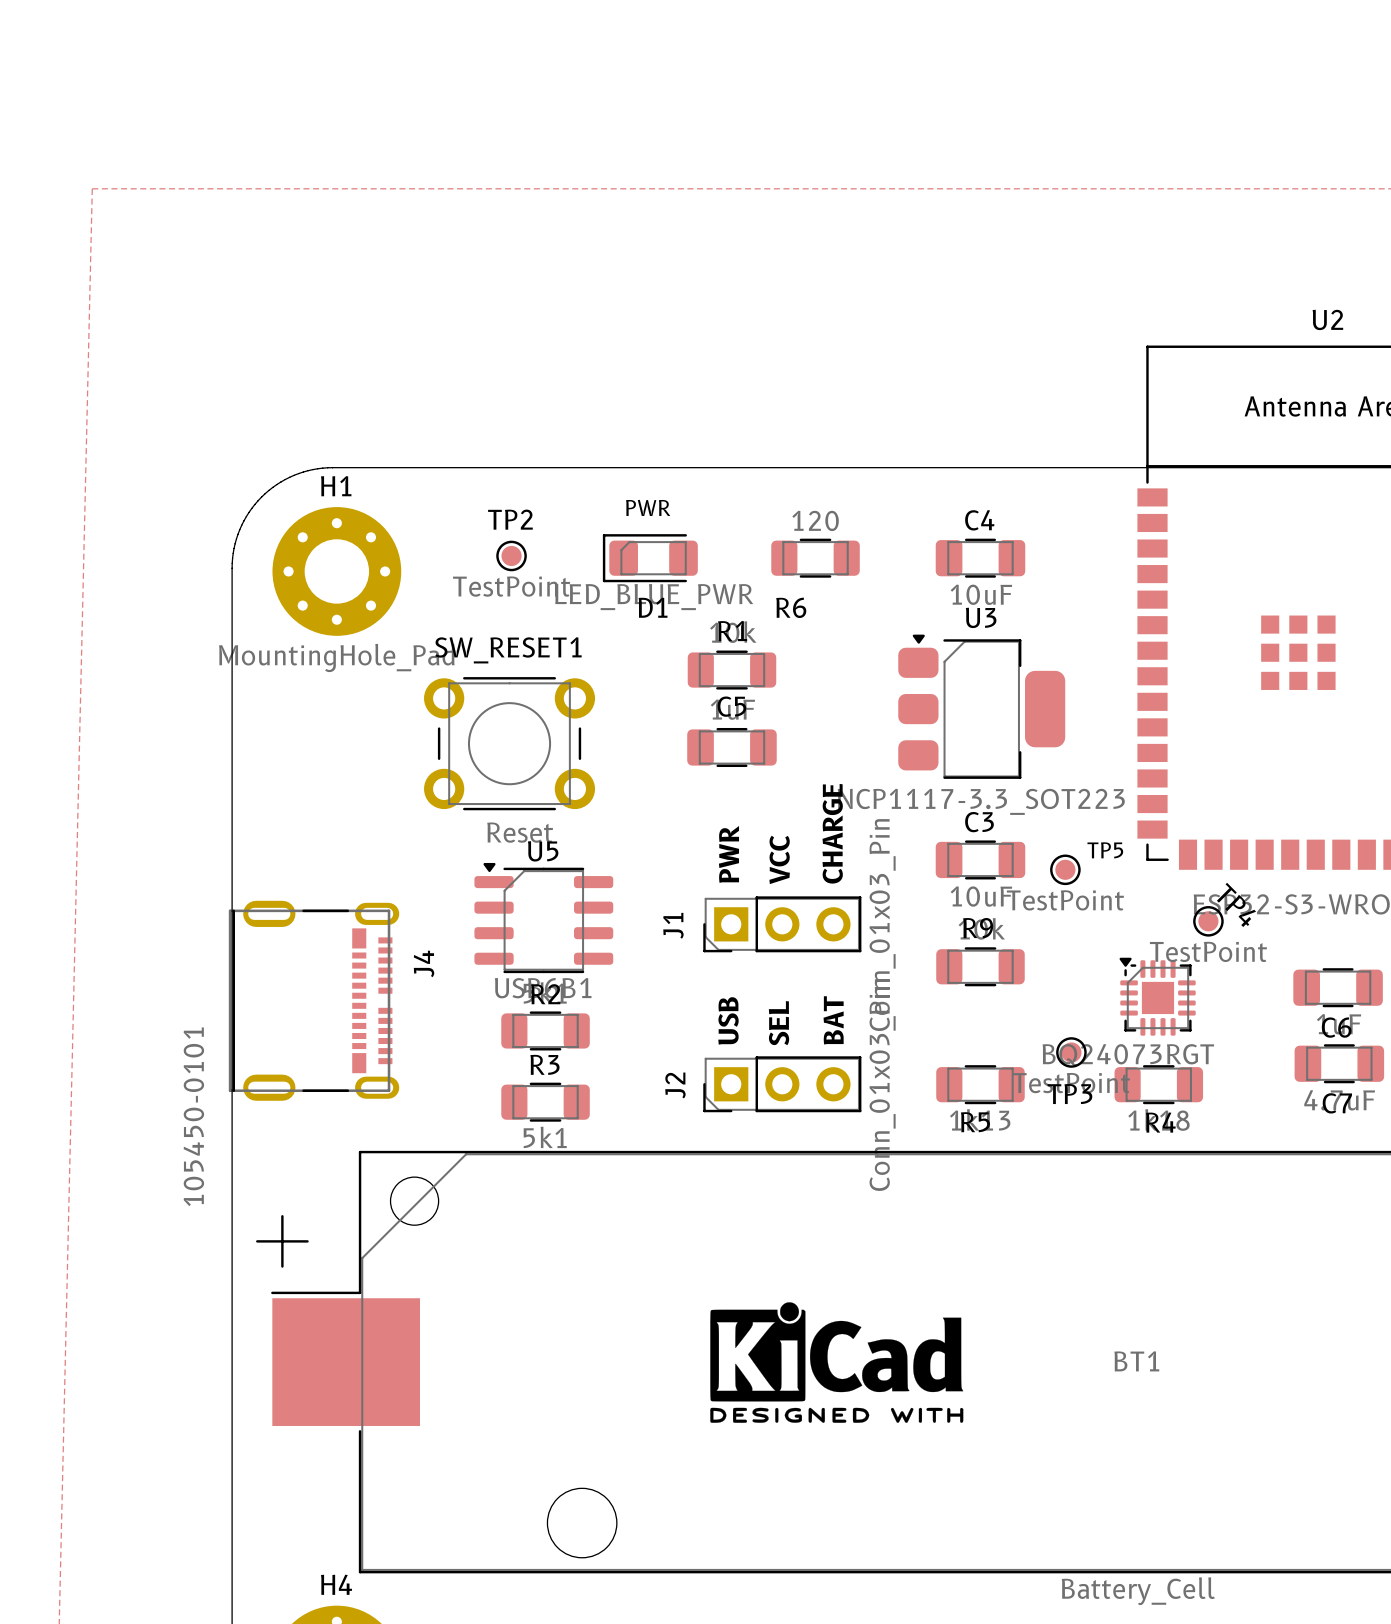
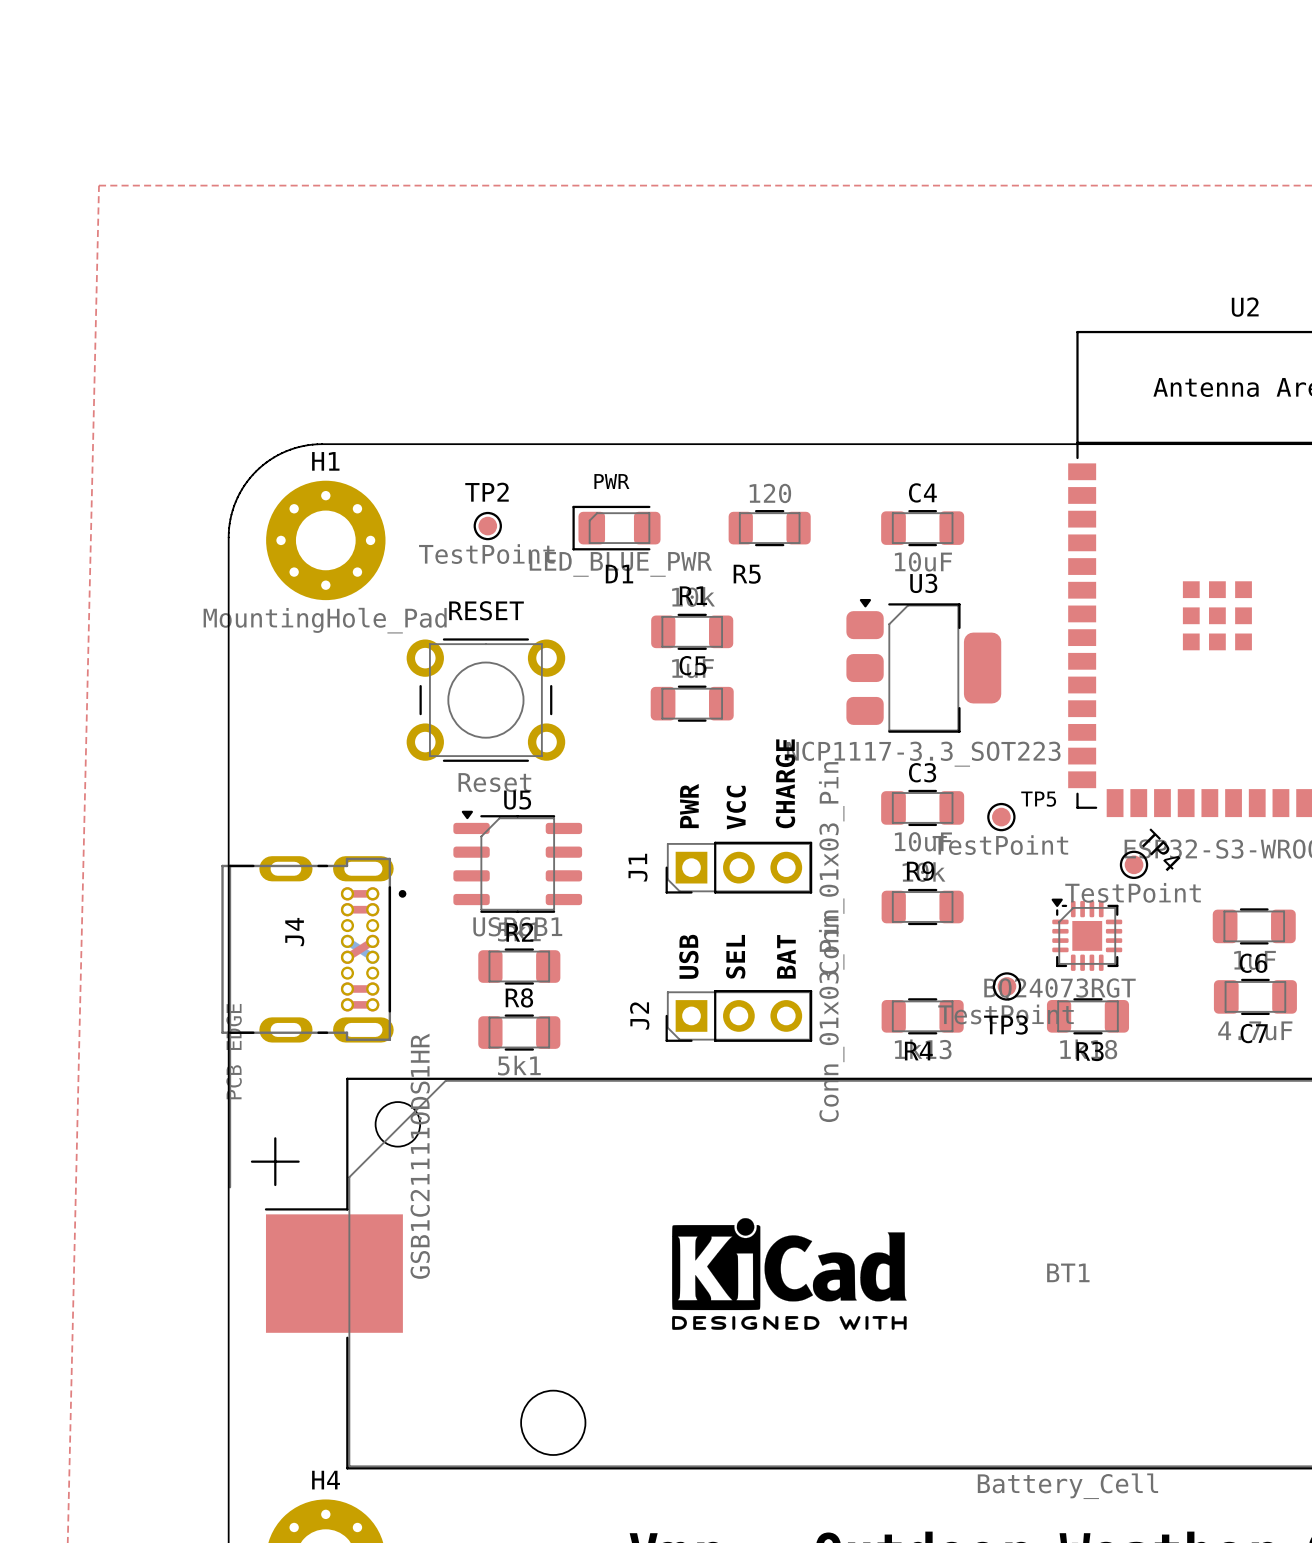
R6 name: R6 (791, 607) -> R5 (747, 574)
SW_RESET1 name: SW_RESET1 (508, 650) -> RESET (486, 610)
J4 footprint: [228, 900, 400, 1101] -> [221, 856, 407, 1189]
J4 name position: J4 (424, 963) -> J4 (294, 932)
R3 name: R3 (544, 1064) -> R8 (519, 997)
J4 value: 105450-0101 (193, 1116) -> GSB1C211110DS1HR (420, 1156)
R5 name: R5 (975, 1122) -> R4 (918, 1051)
R4 name: R4 (1160, 1122) -> R3 (1090, 1051)

